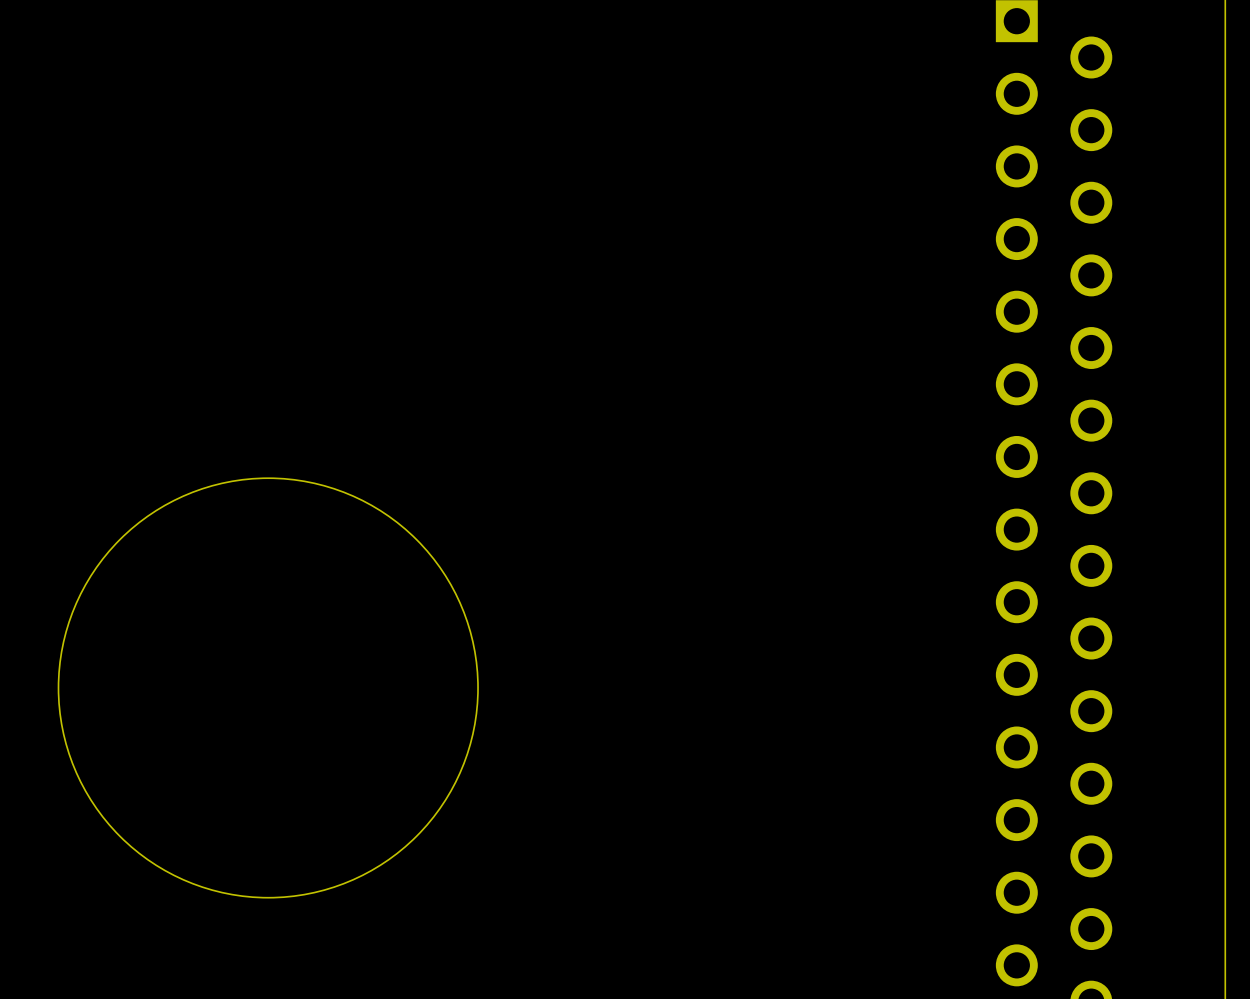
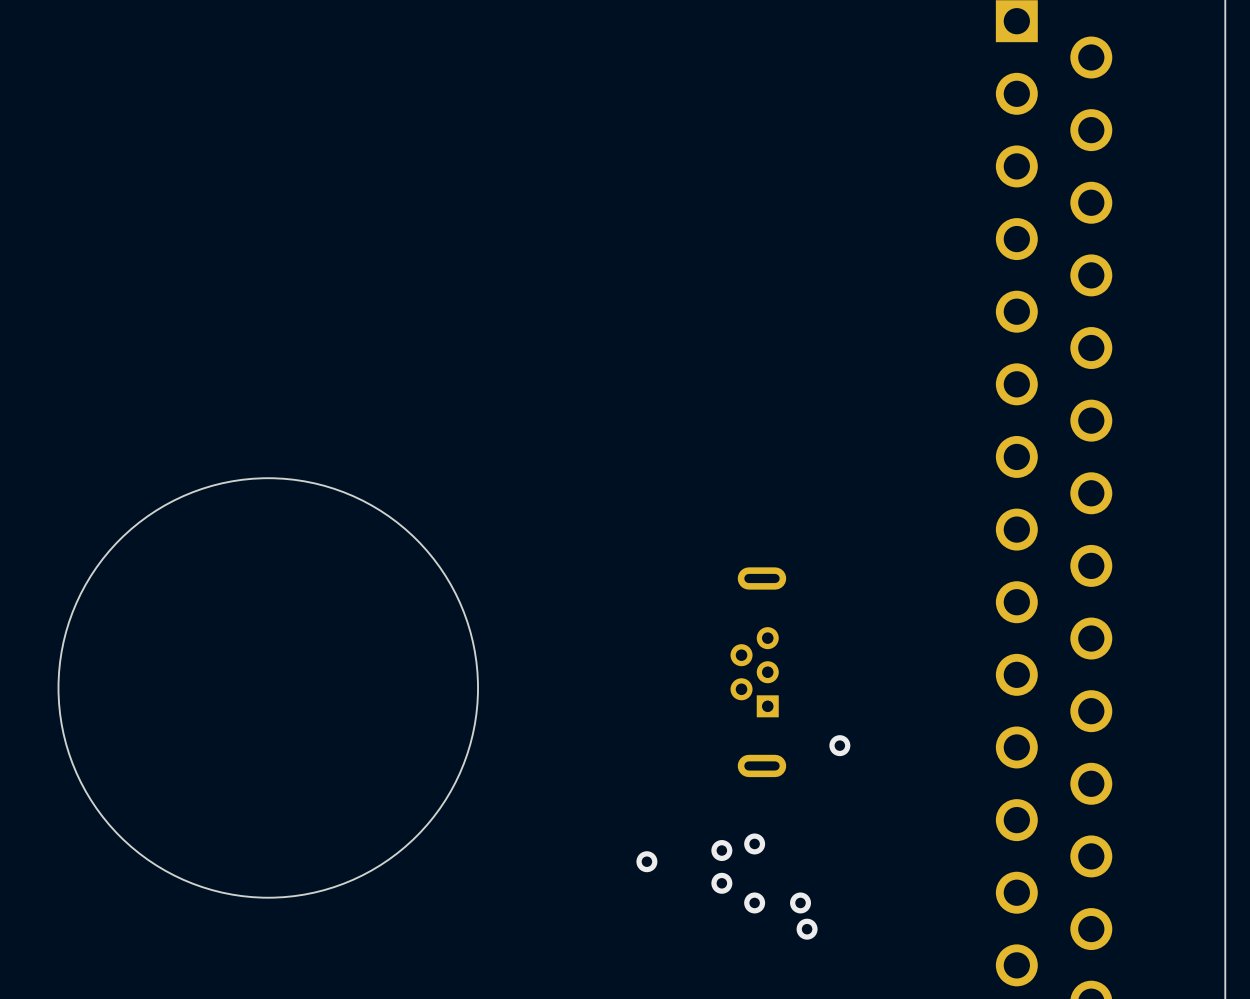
part: none -> (758, 672)
via: none -> (839, 745)
via: none -> (754, 843)
via: none -> (721, 850)
via: none -> (646, 861)
via: none -> (721, 883)
via: none -> (754, 902)
via: none -> (800, 902)
via: none -> (807, 929)

